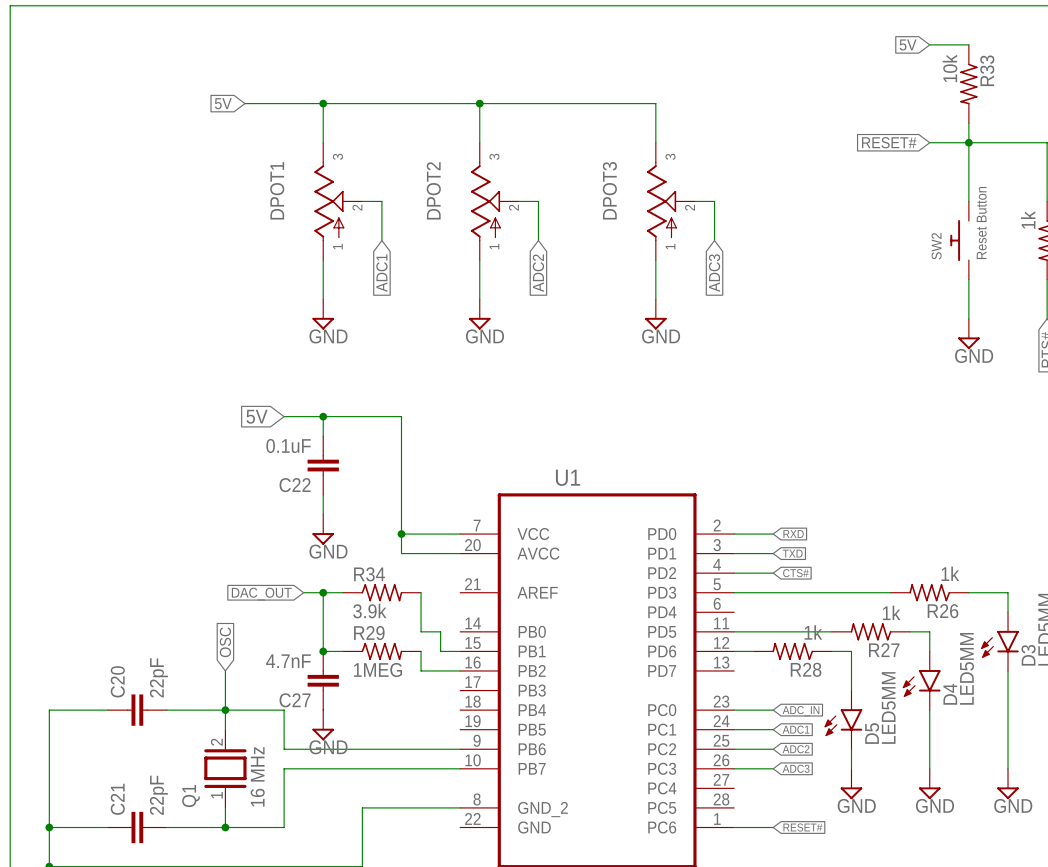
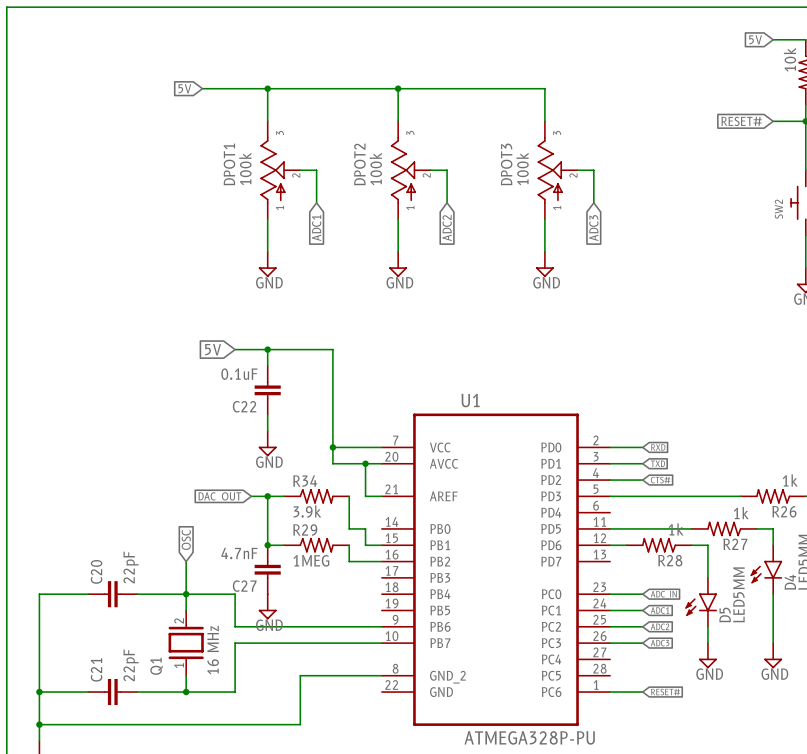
DPOT1 value: none -> 100k (245, 168)
DPOT2 value: none -> 100k (375, 168)
DPOT3 value: none -> 100k (522, 168)
wire: none -> (365, 463) (365, 496) (381, 496)
junction: none -> (365, 463)

